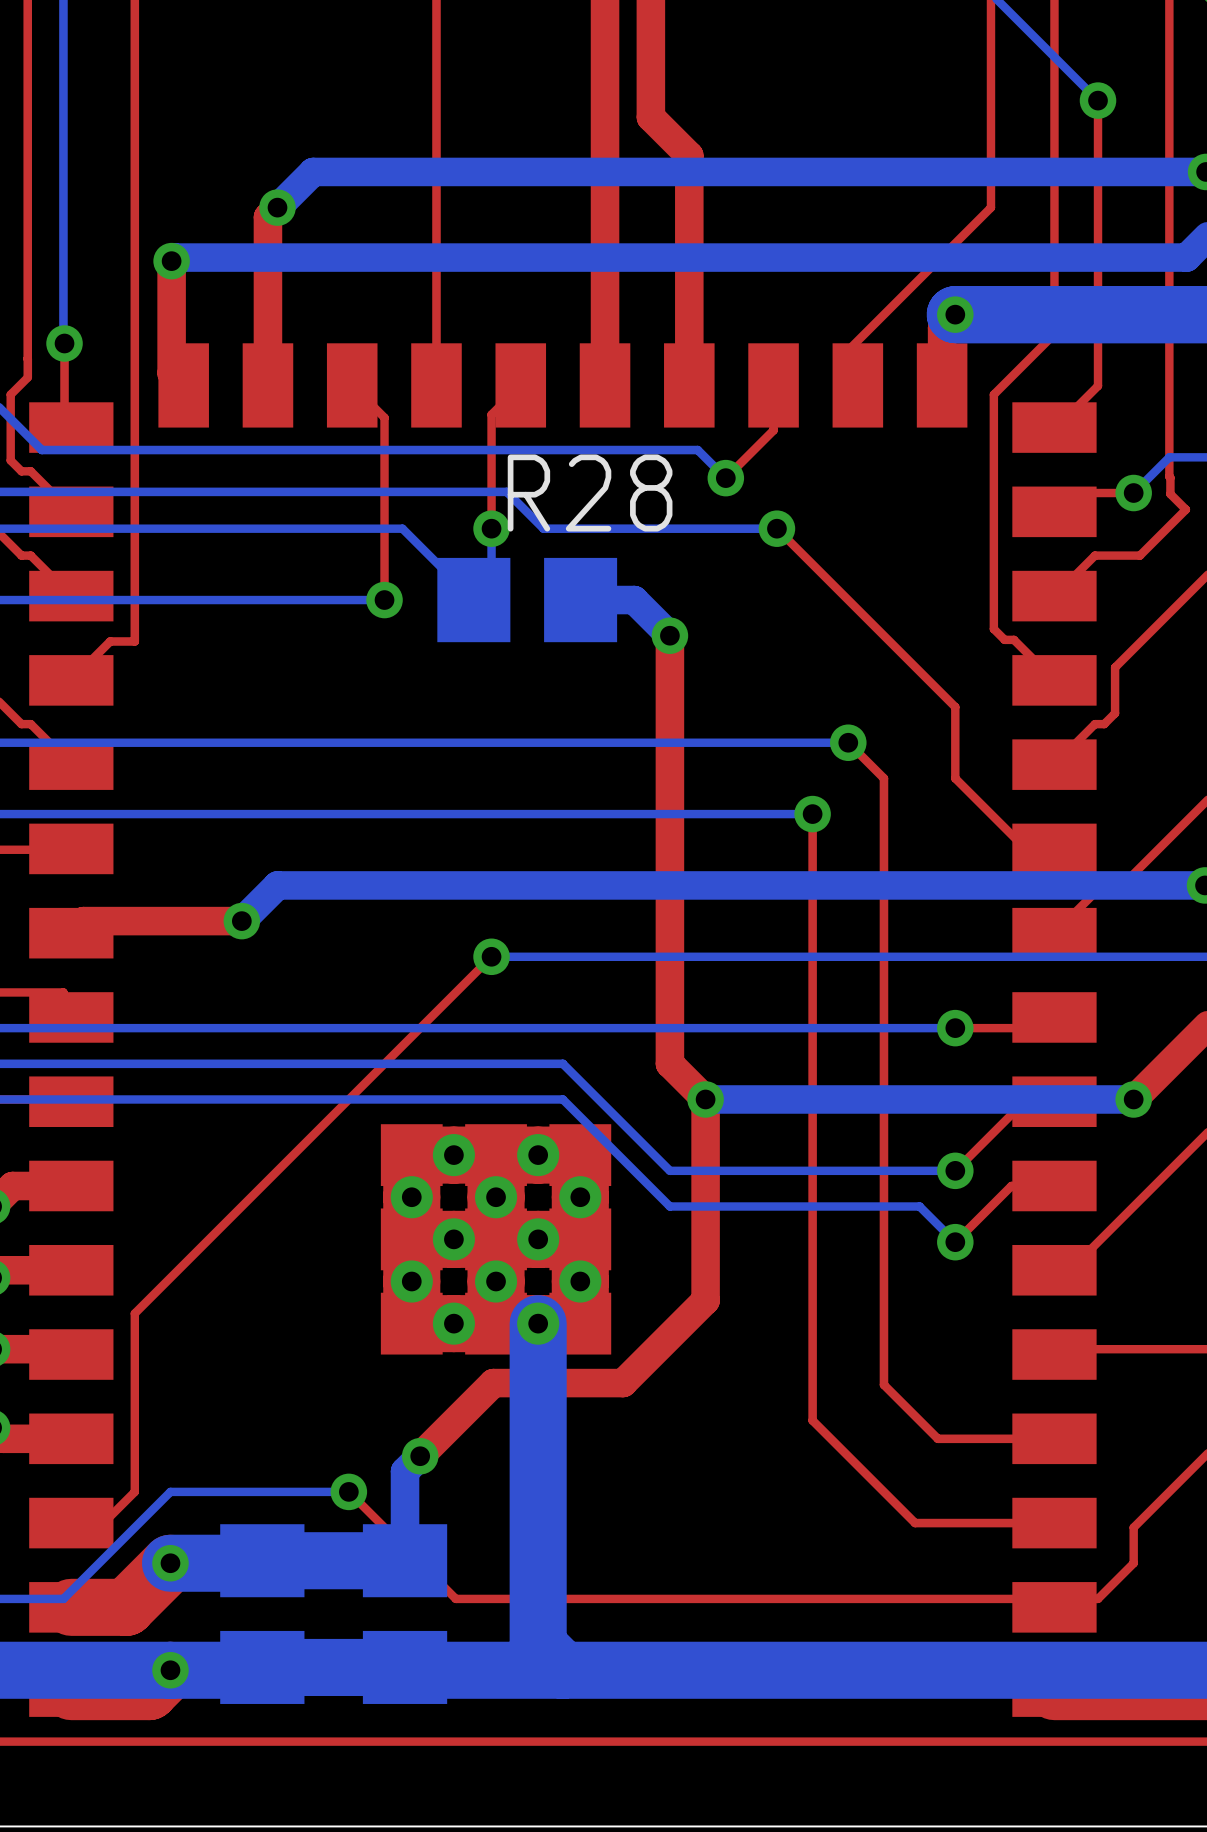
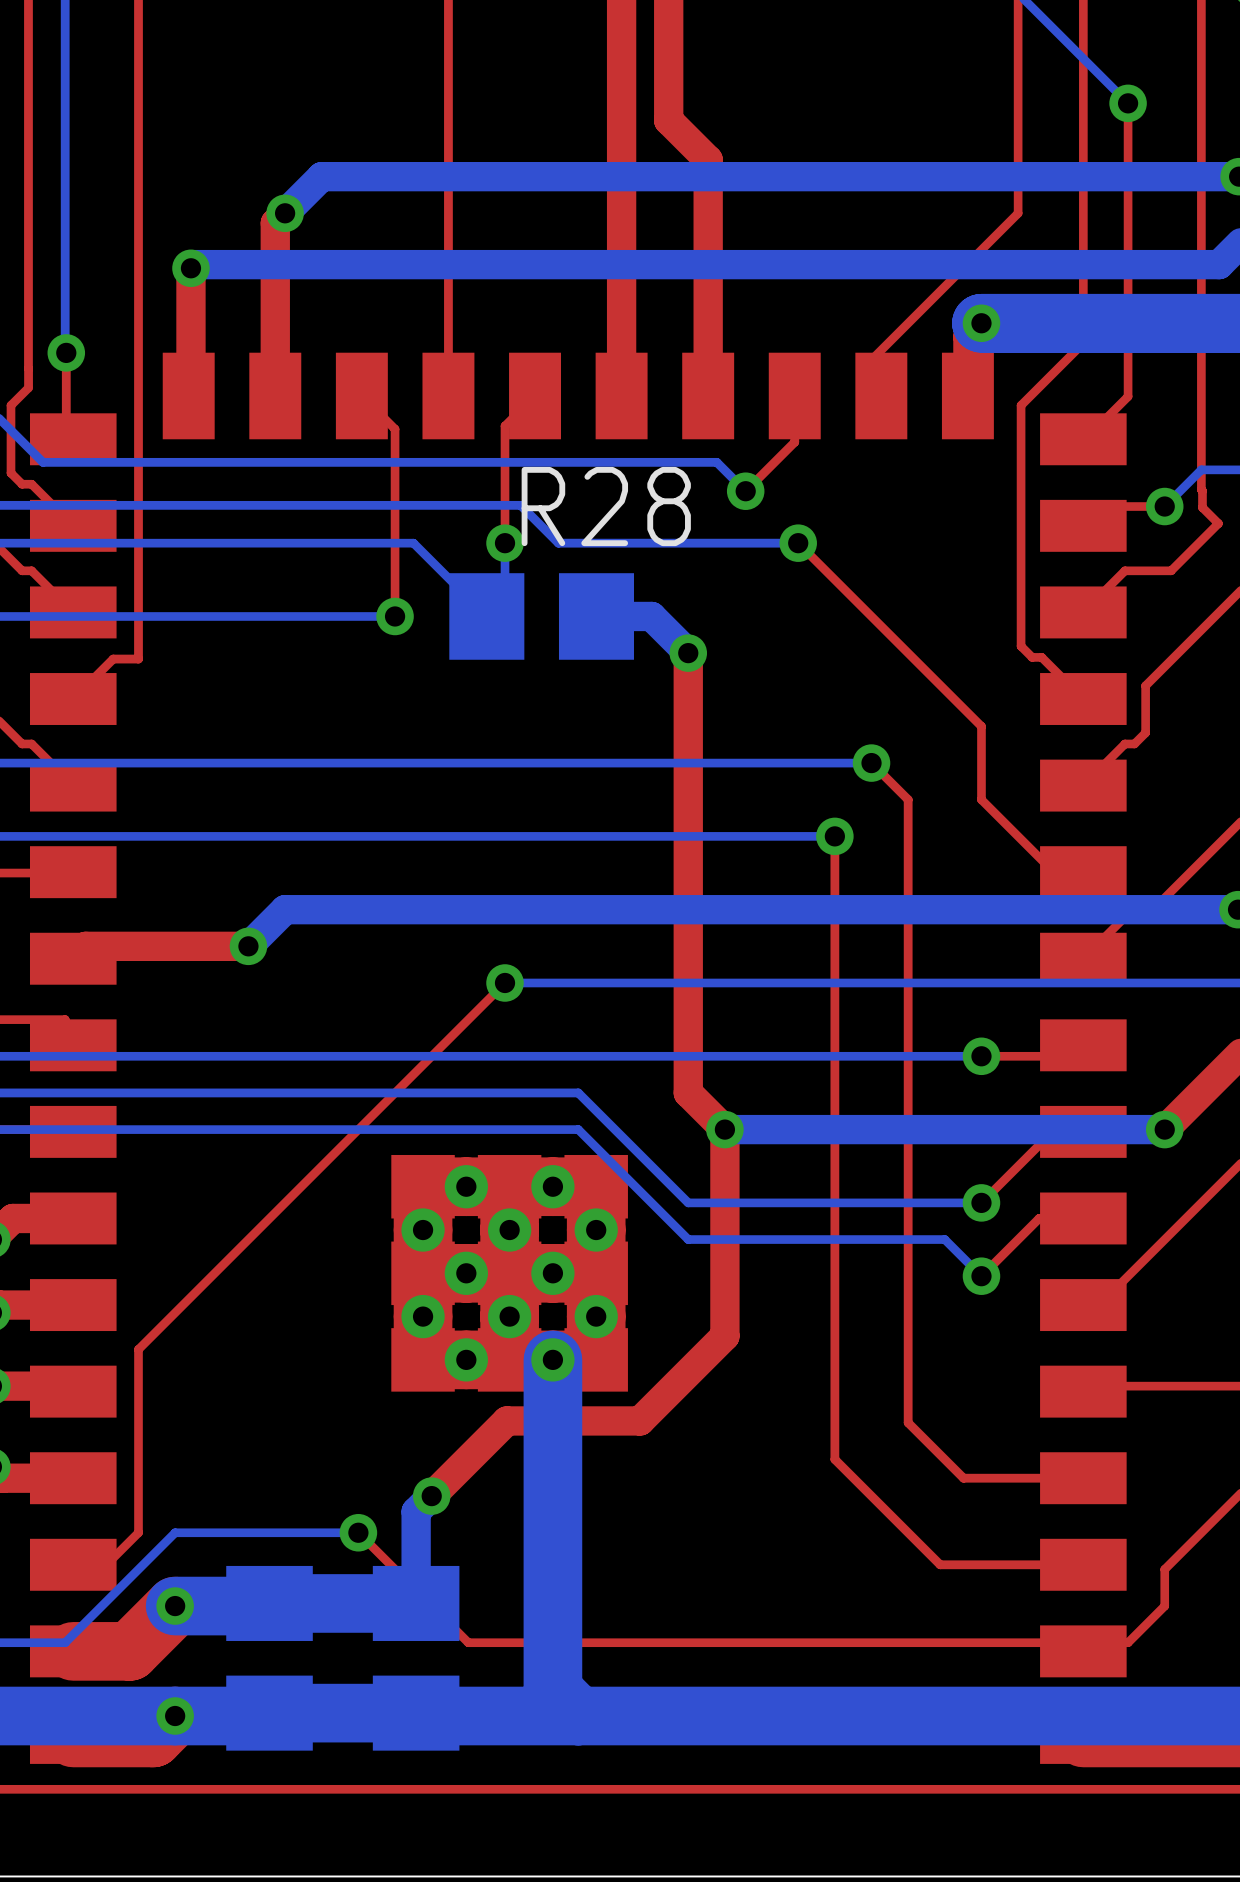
top track: (171, 261) (171, 373) (183, 385) -> (190, 268) (190, 393) (188, 395)
via position: (171, 261) -> (190, 268)

